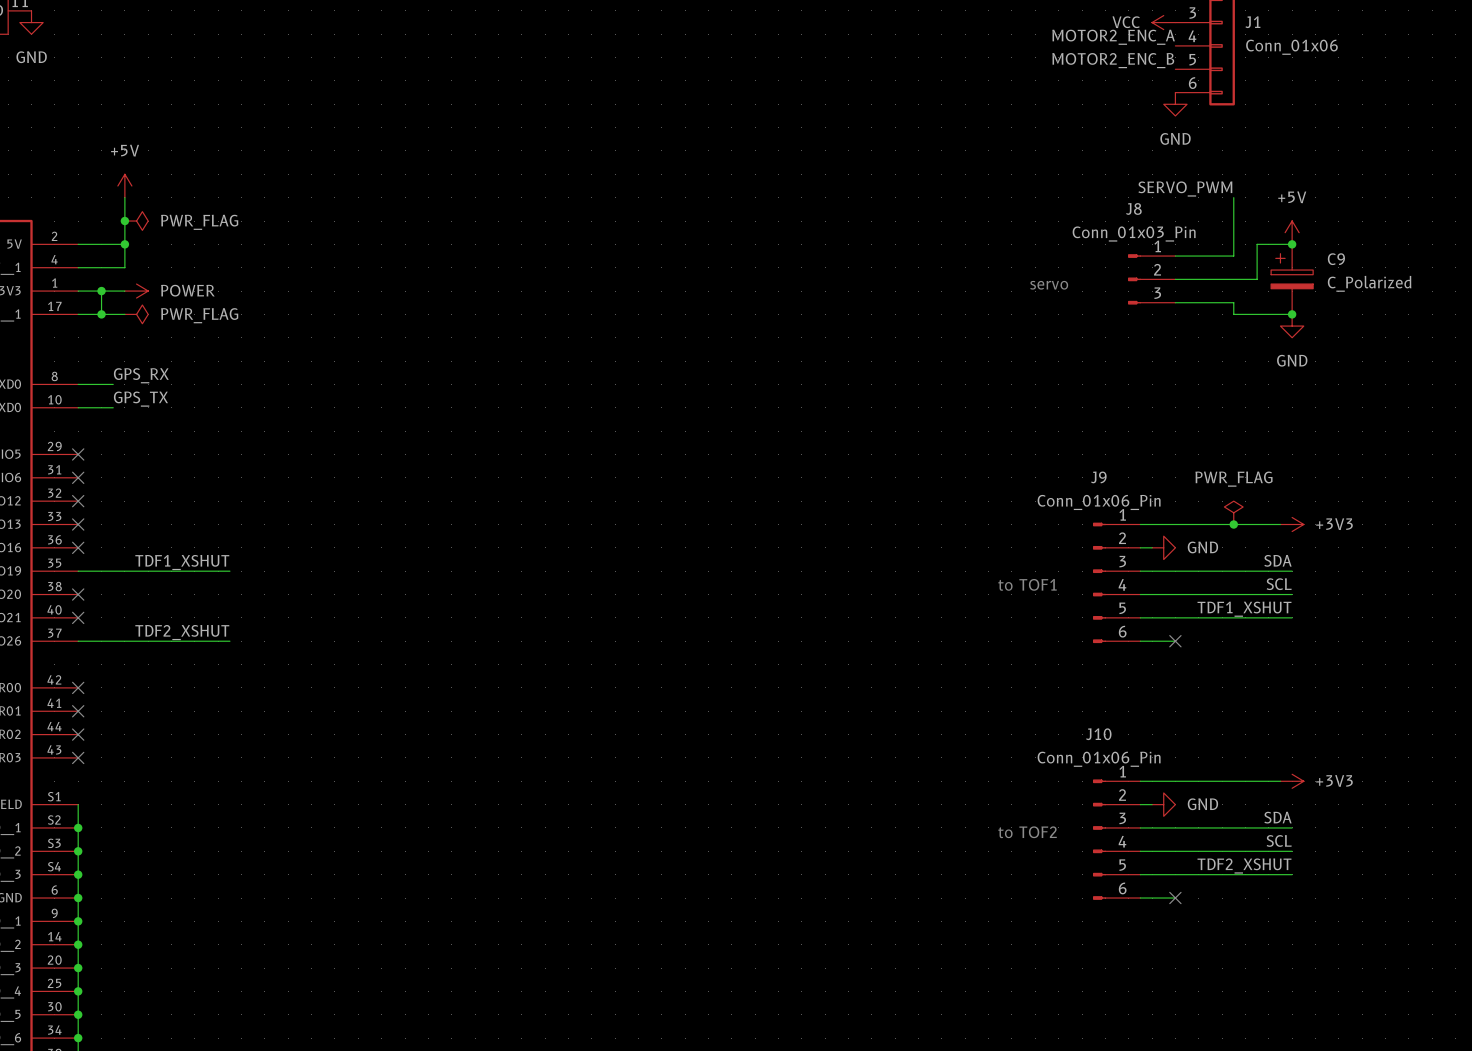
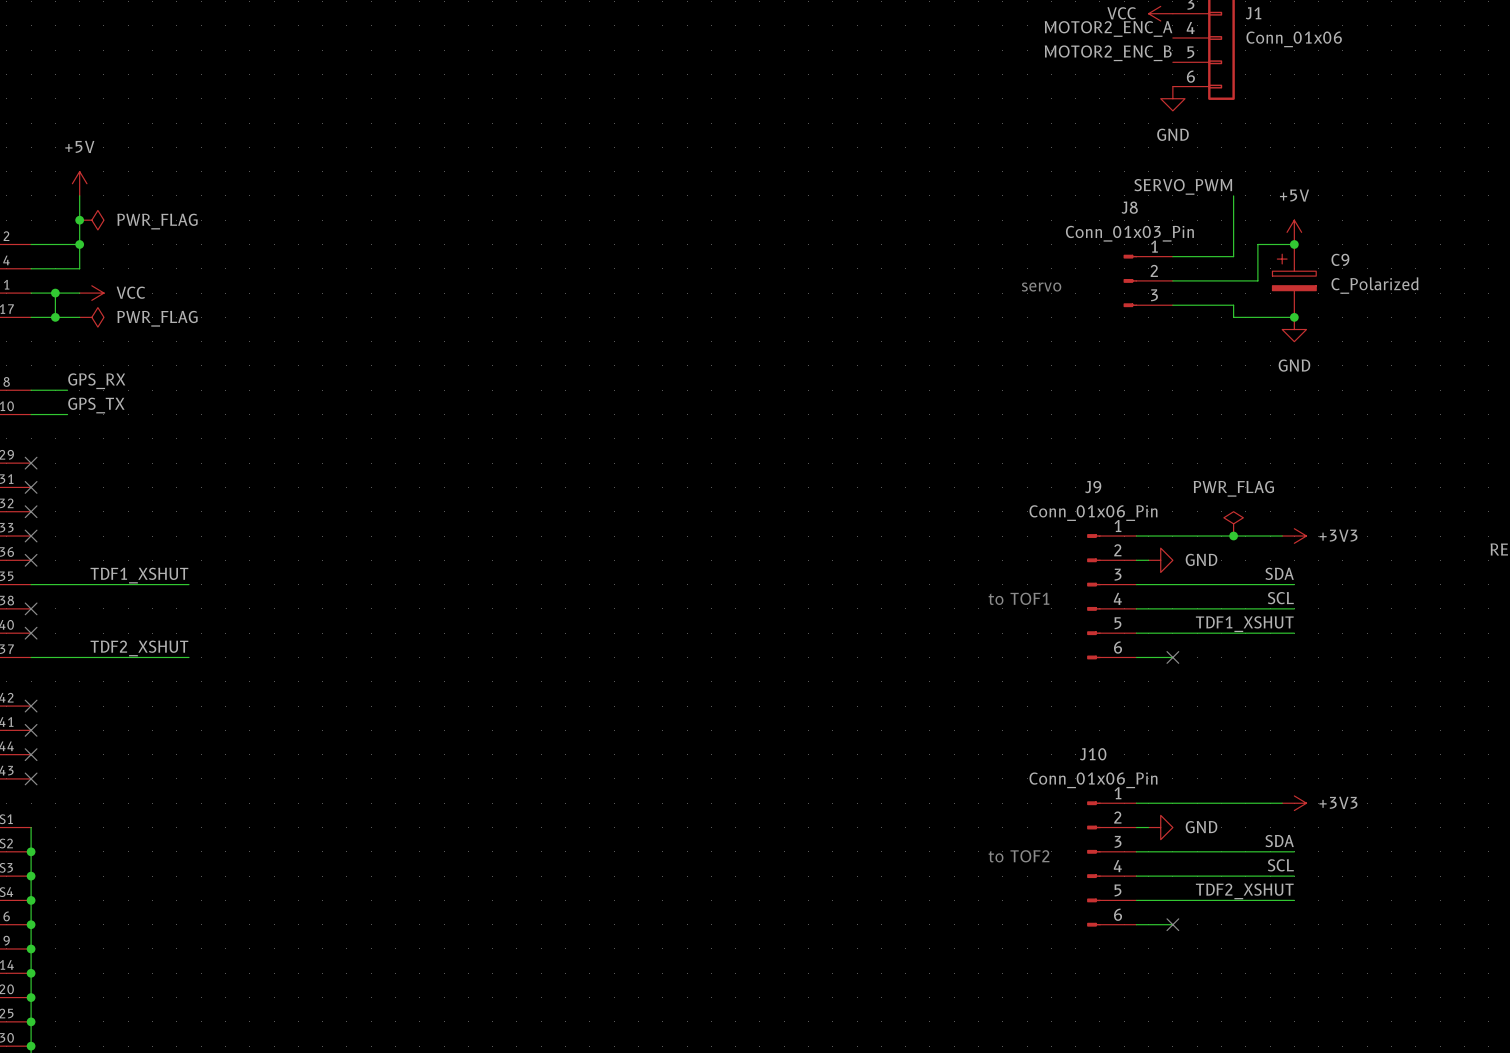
power symbol: POWER (136, 291) -> VCC (91, 293)

